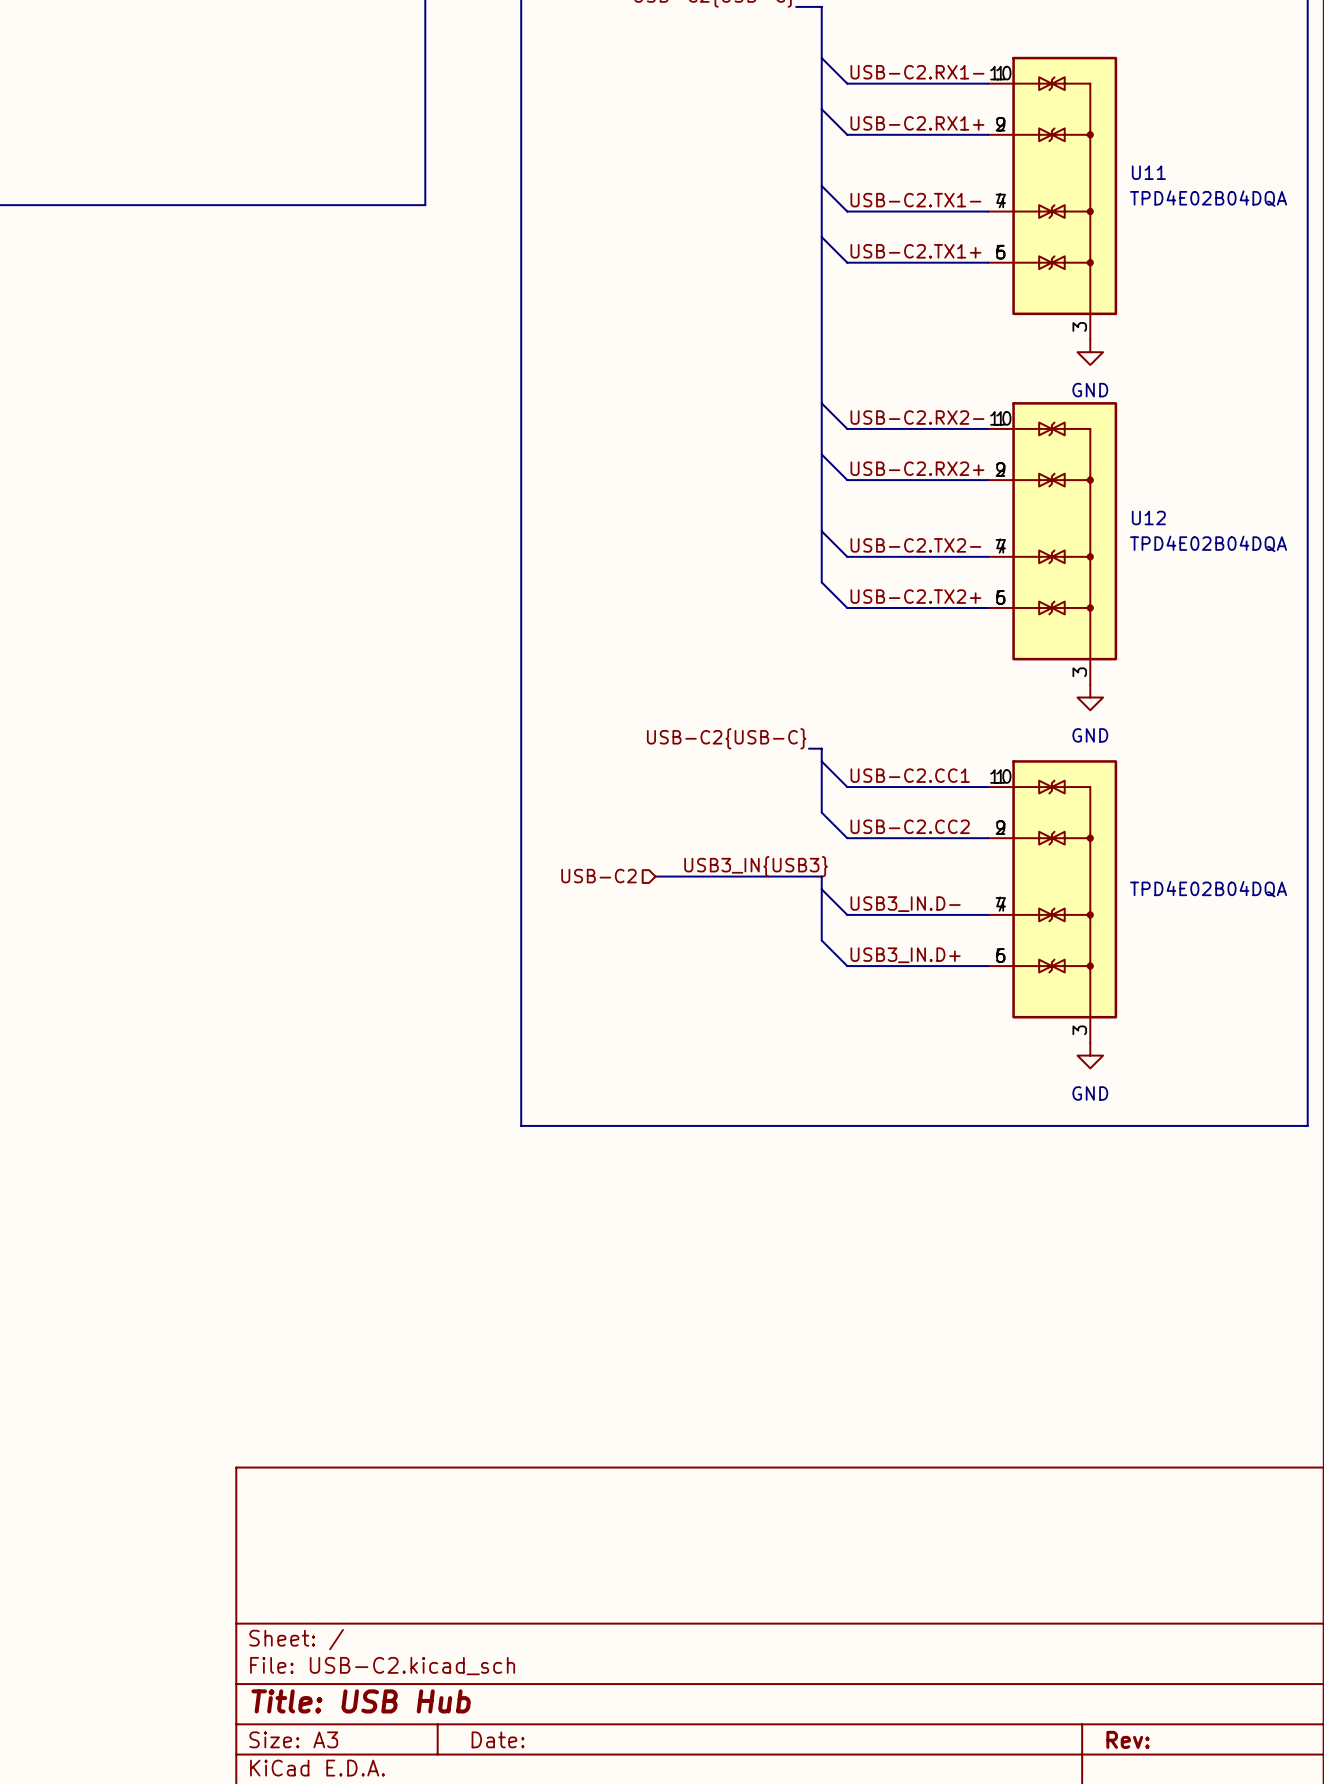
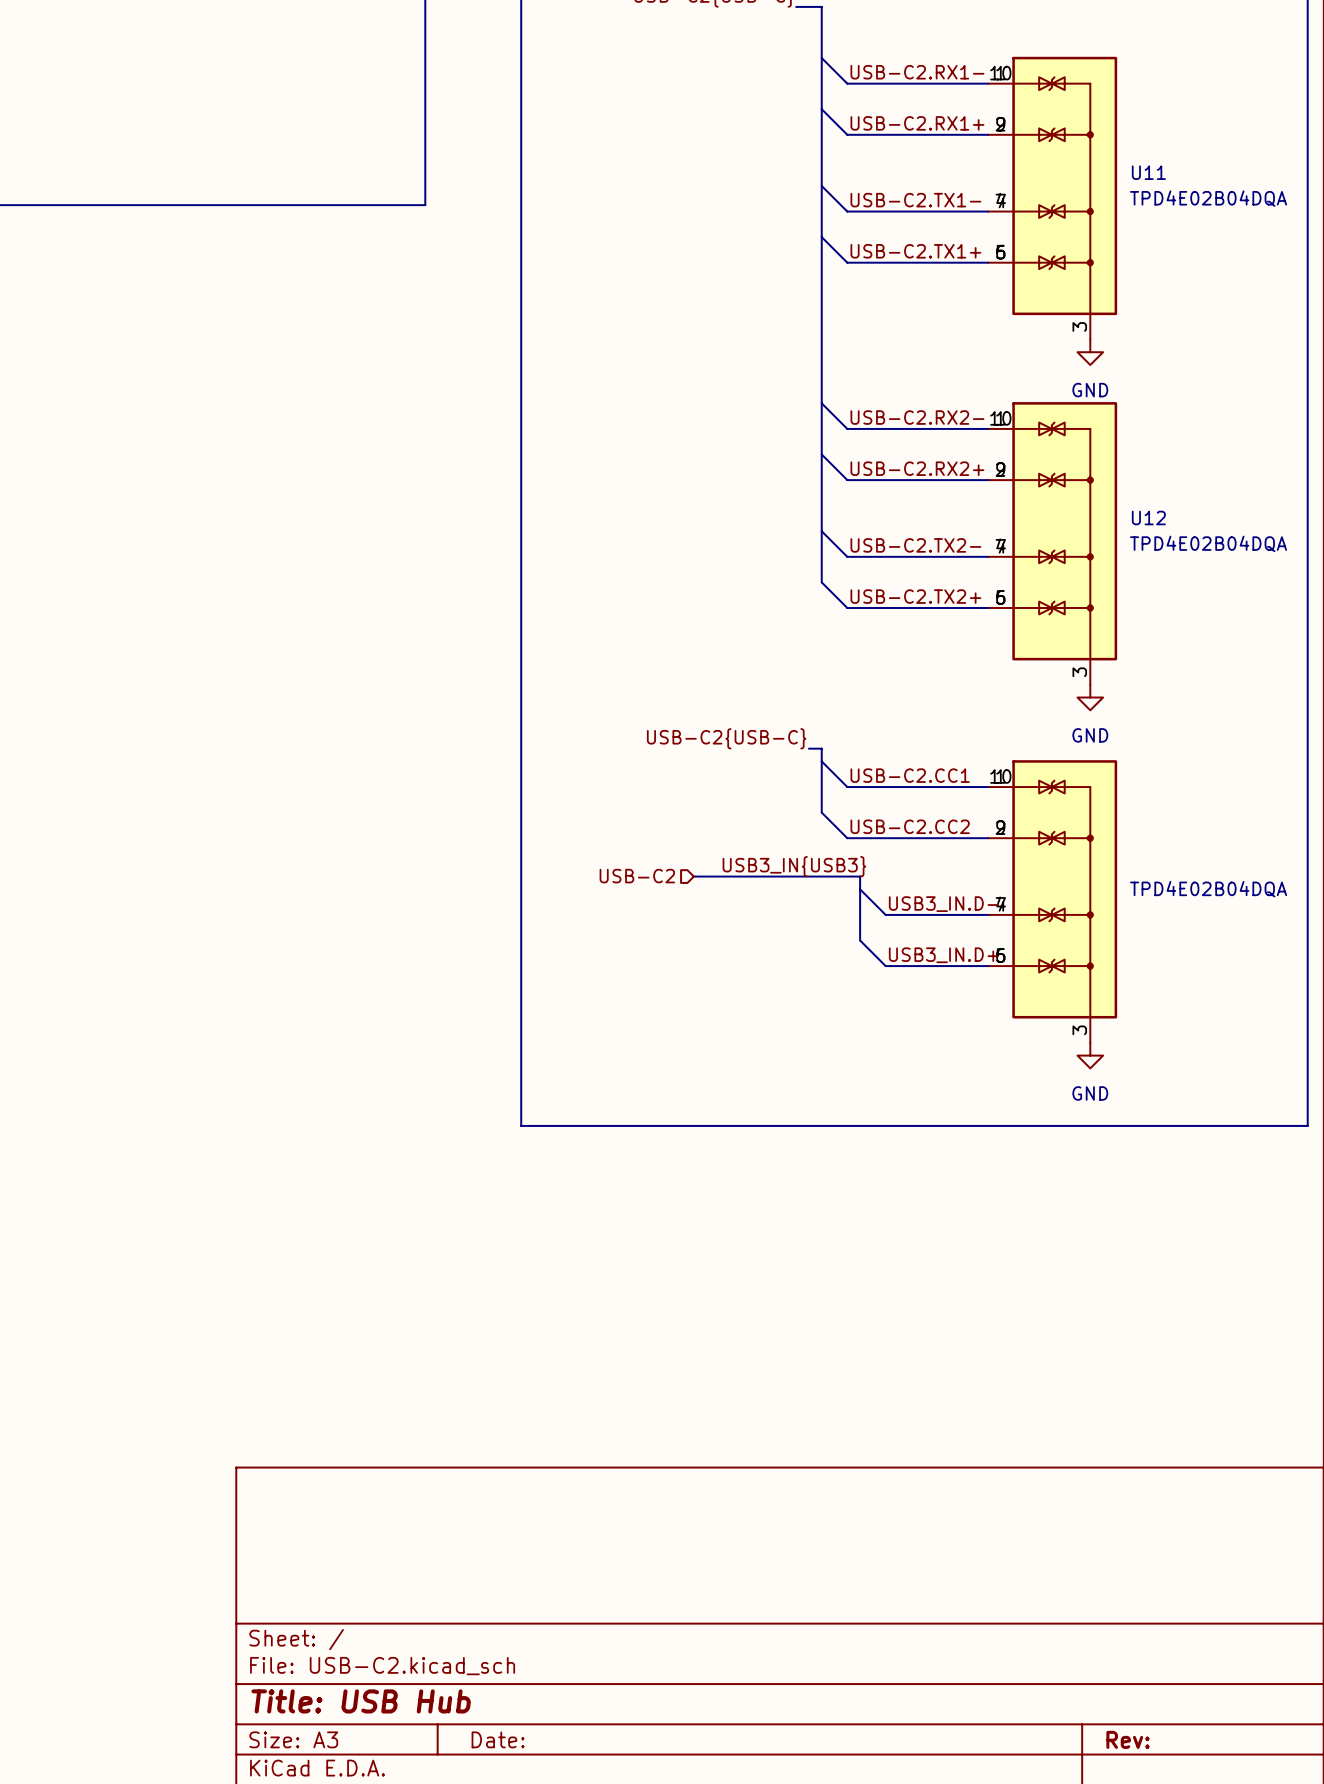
label position: USB3_IN{USB3} (756, 866) -> USB3_IN{USB3} (794, 866)
hierarchical label position: USB-C2 (598, 876) -> USB-C2 (637, 876)
bus: (655, 876) (693, 876) -> none
bus: (821, 876) (821, 940) -> (821, 876) (860, 876) (860, 940)
wire: (821, 889) (847, 914) (885, 914) -> (860, 889) (885, 914)
label position: USB3_IN.D- (905, 904) -> USB3_IN.D- (943, 904)
wire: (821, 940) (847, 966) (885, 966) -> (860, 940) (885, 966)
label position: USB3_IN.D+ (905, 955) -> USB3_IN.D+ (943, 955)

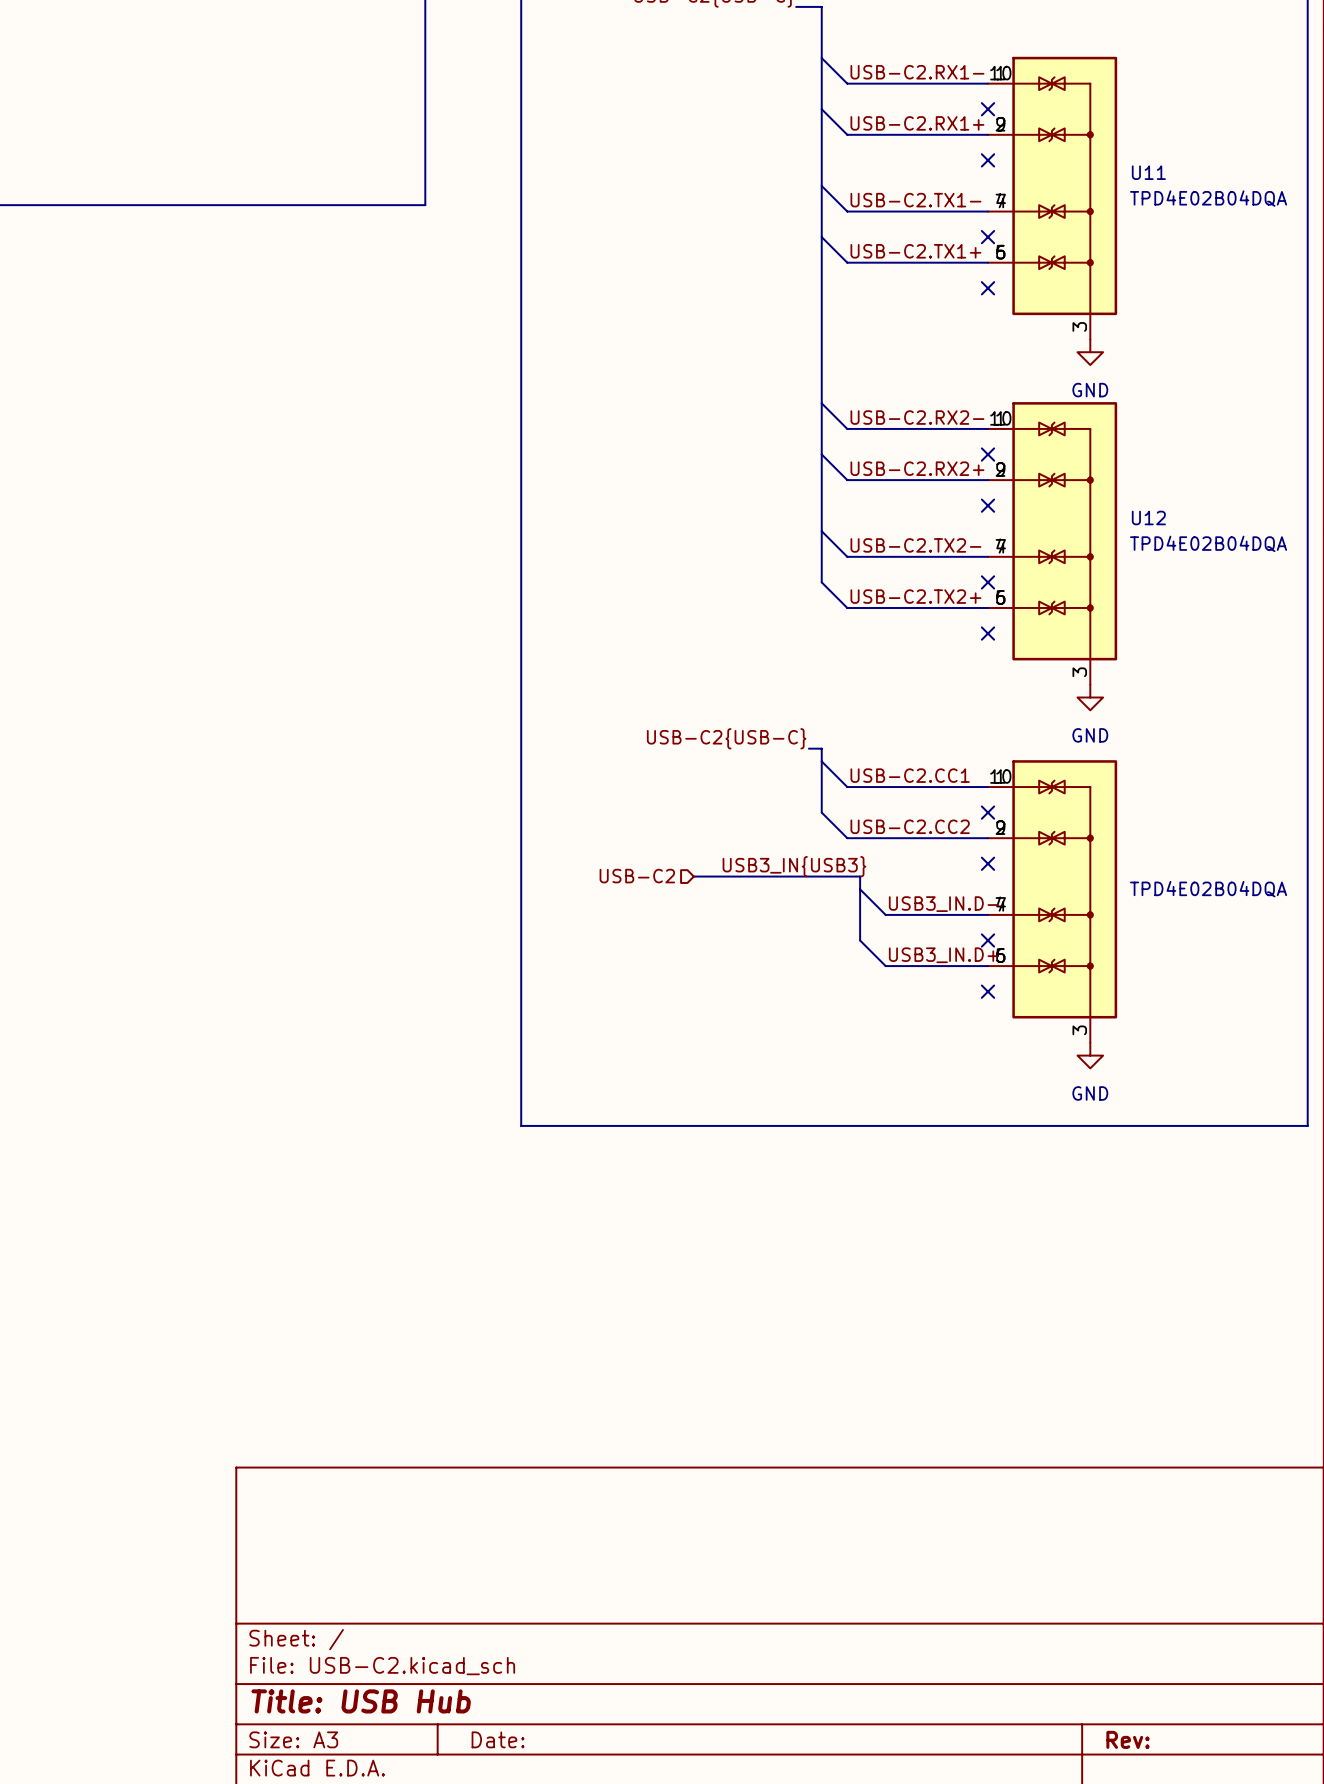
no-connect mark: none -> (988, 109)
no-connect mark: none -> (988, 160)
no-connect mark: none -> (988, 237)
no-connect mark: none -> (988, 288)
no-connect mark: none -> (988, 454)
no-connect mark: none -> (988, 505)
no-connect mark: none -> (988, 582)
no-connect mark: none -> (988, 633)
no-connect mark: none -> (988, 812)
no-connect mark: none -> (988, 863)
no-connect mark: none -> (988, 940)
no-connect mark: none -> (988, 991)

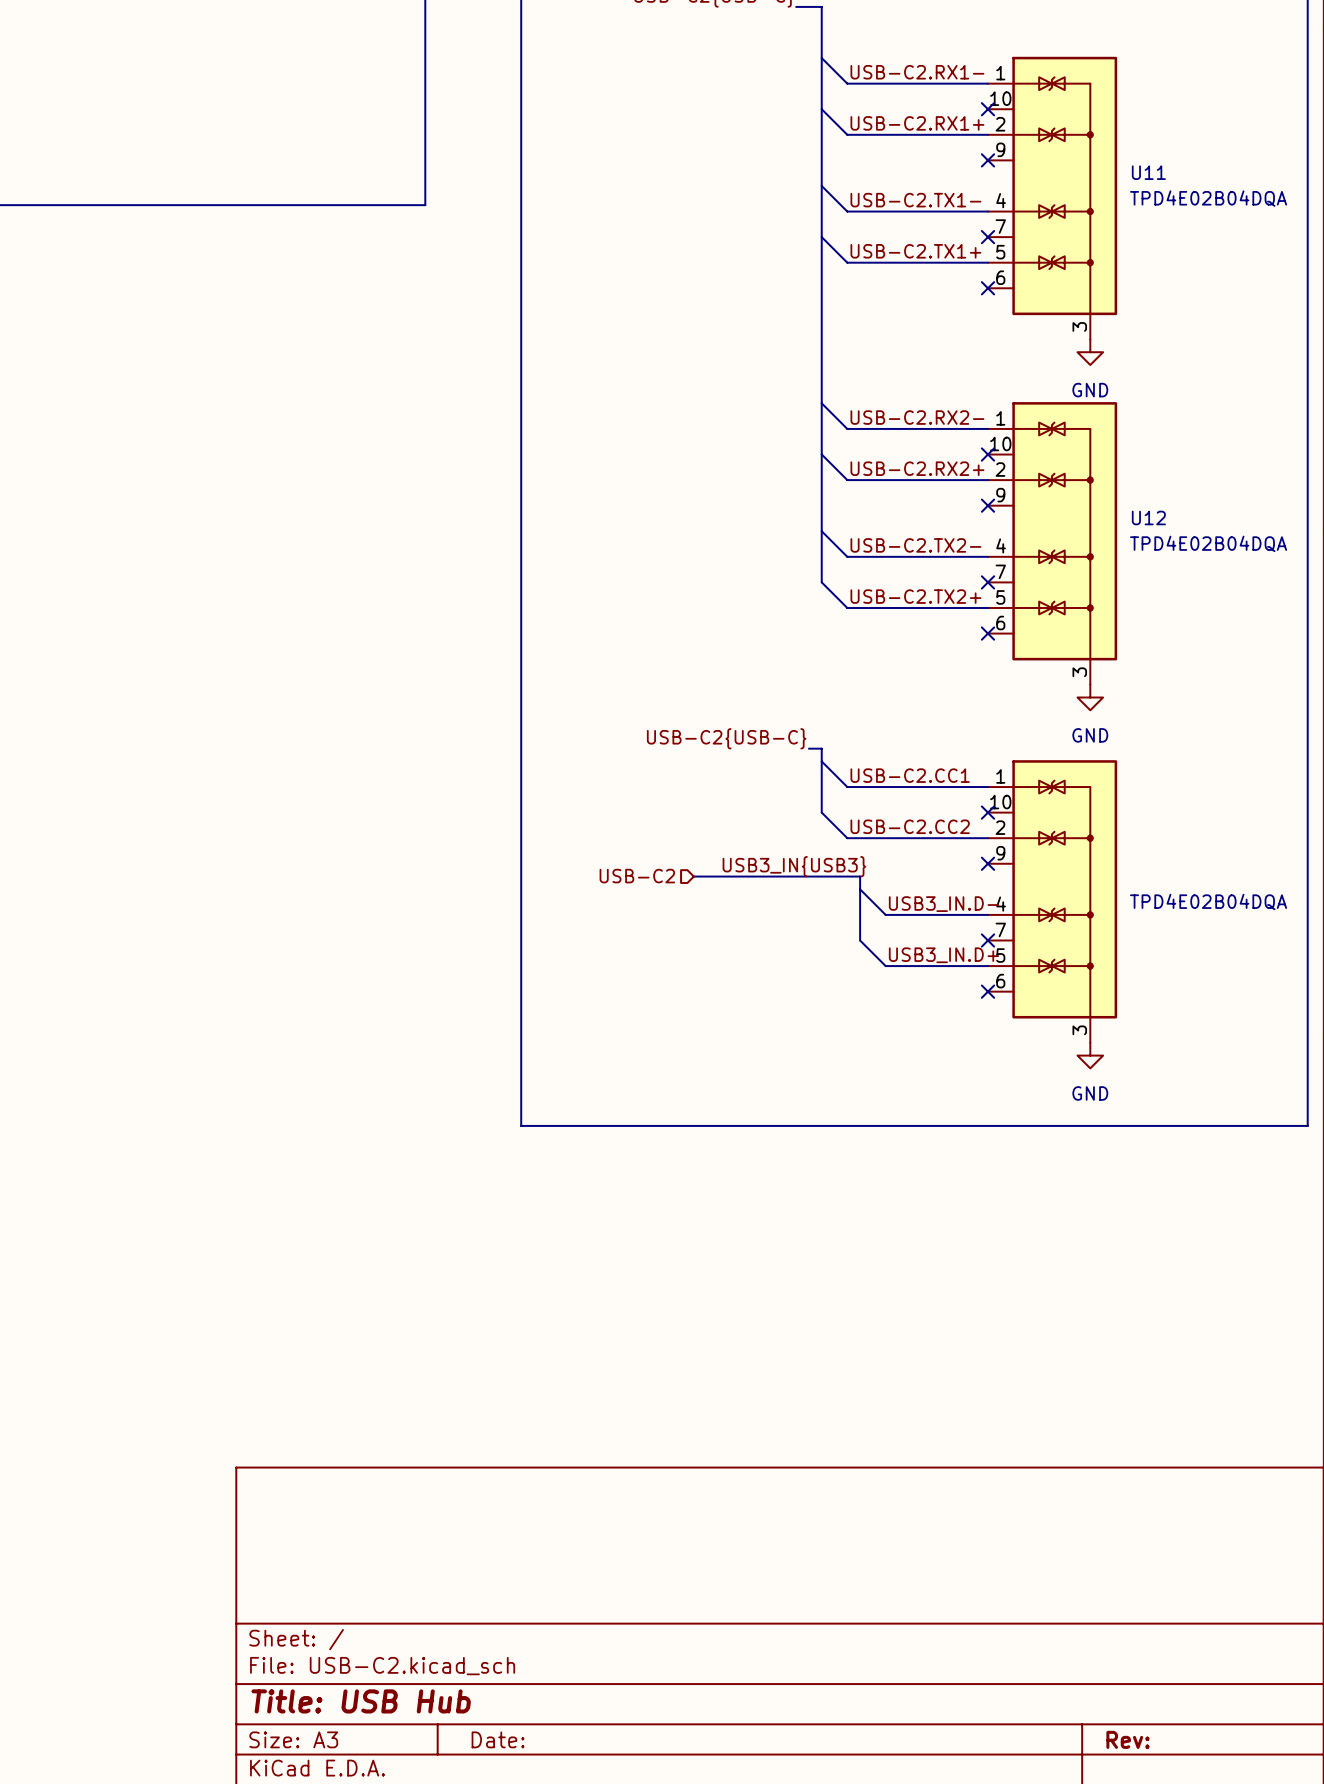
U11 symbol: [988, 56, 1118, 340] -> [988, 56, 1118, 340]
U12 symbol: [988, 402, 1118, 685] -> [988, 402, 1118, 685]
part symbol: [988, 760, 1118, 1043] -> [988, 760, 1118, 1043]

